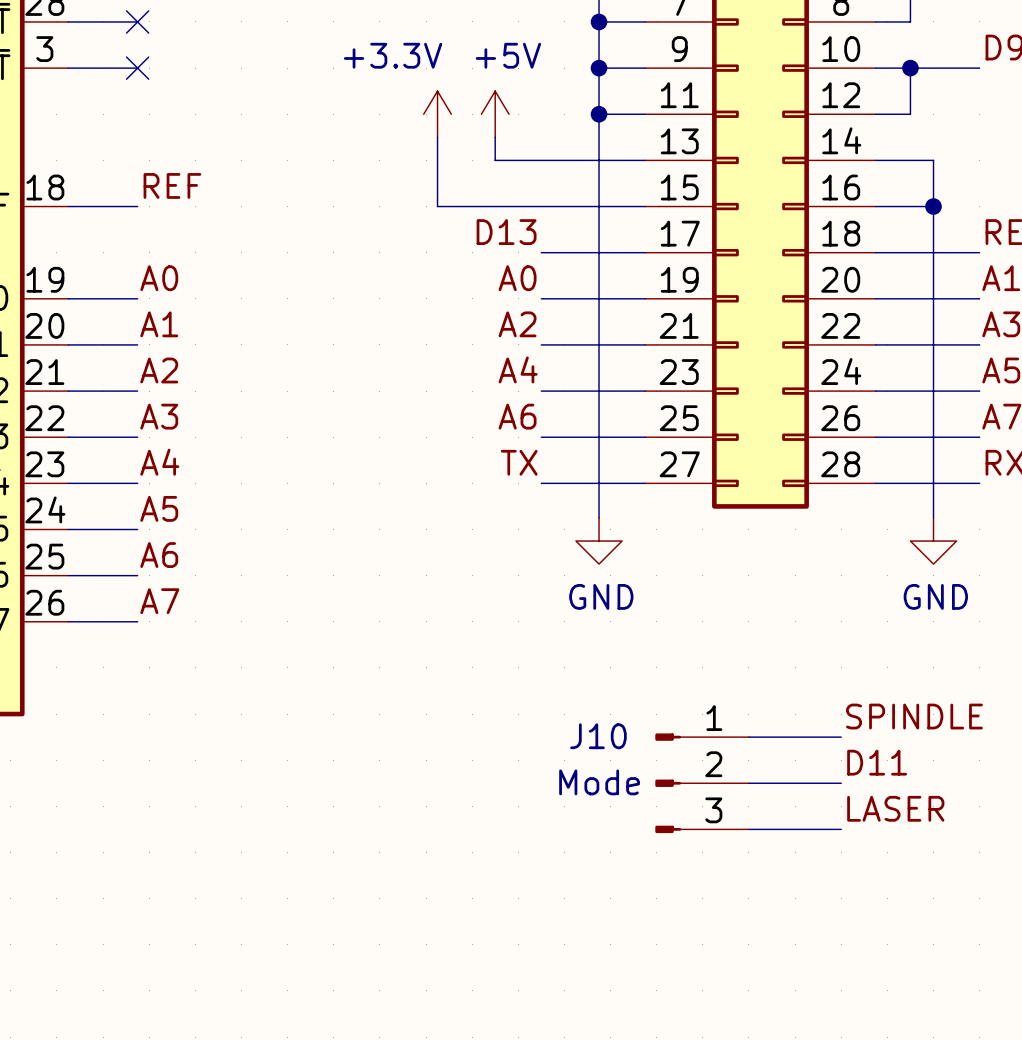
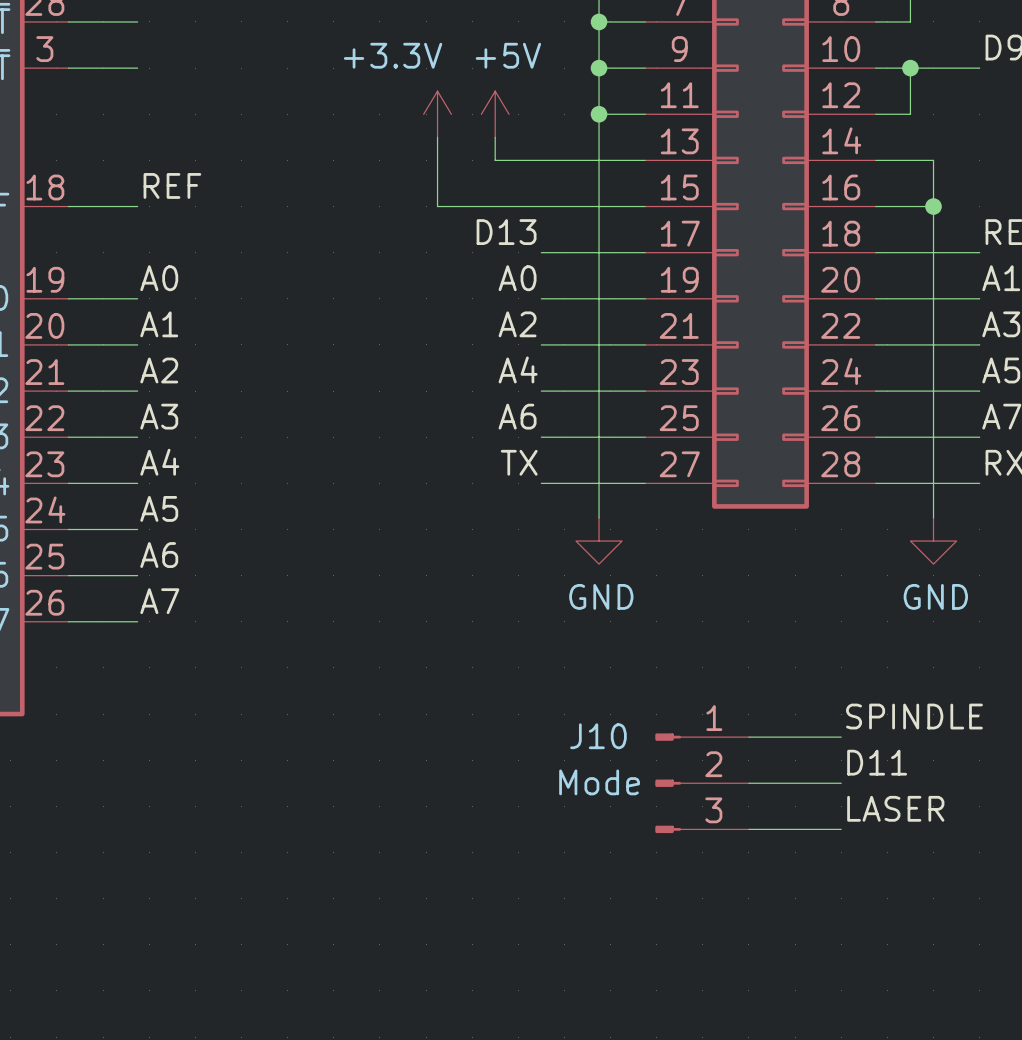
no-connect mark: (137, 21) -> none
no-connect mark: (137, 68) -> none

